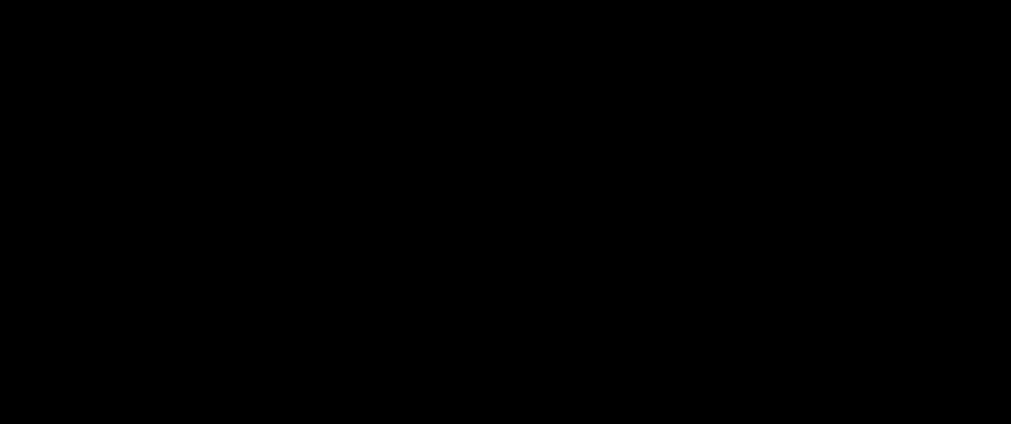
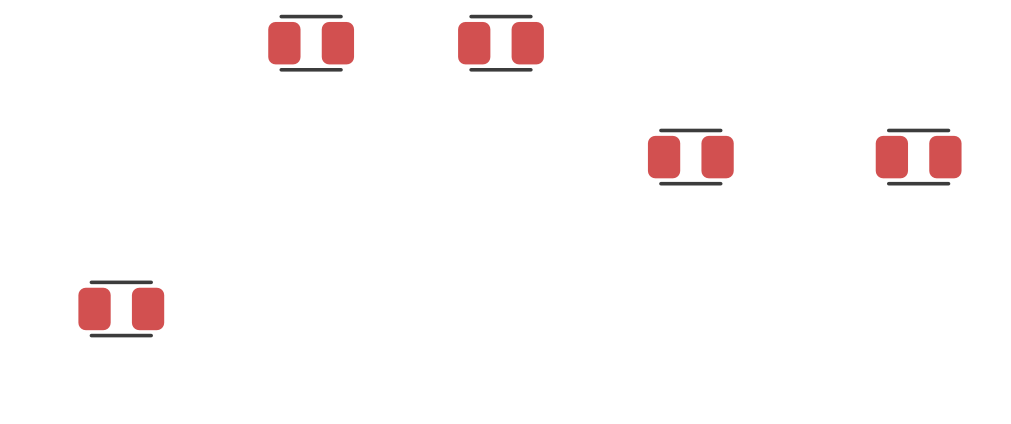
part: none -> (311, 43)
part: none -> (500, 43)
part: none -> (690, 157)
part: none -> (918, 157)
part: none -> (121, 308)

